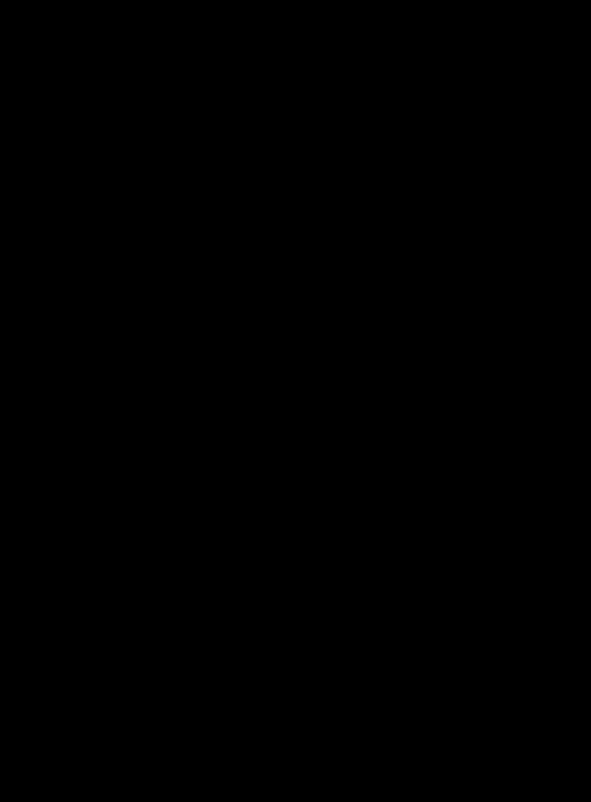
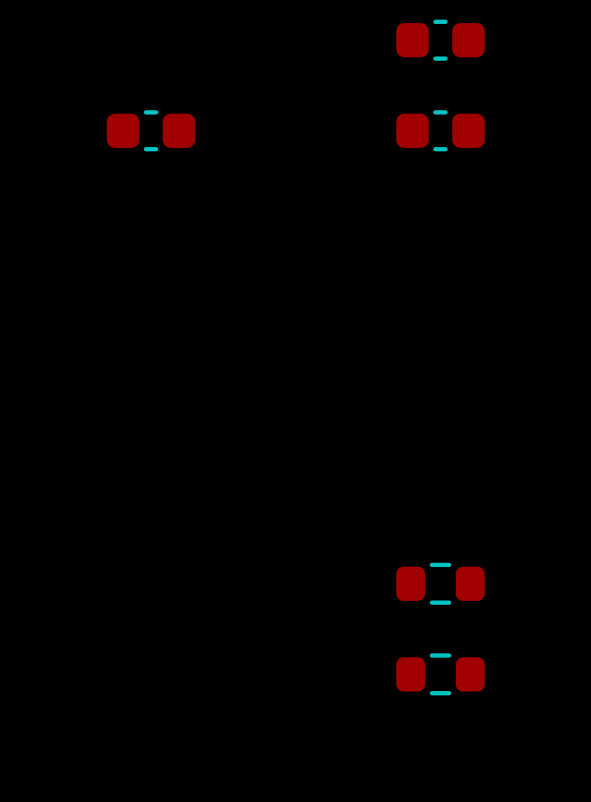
part: none -> (440, 40)
part: none -> (151, 130)
part: none -> (440, 130)
part: none -> (440, 583)
part: none -> (440, 674)

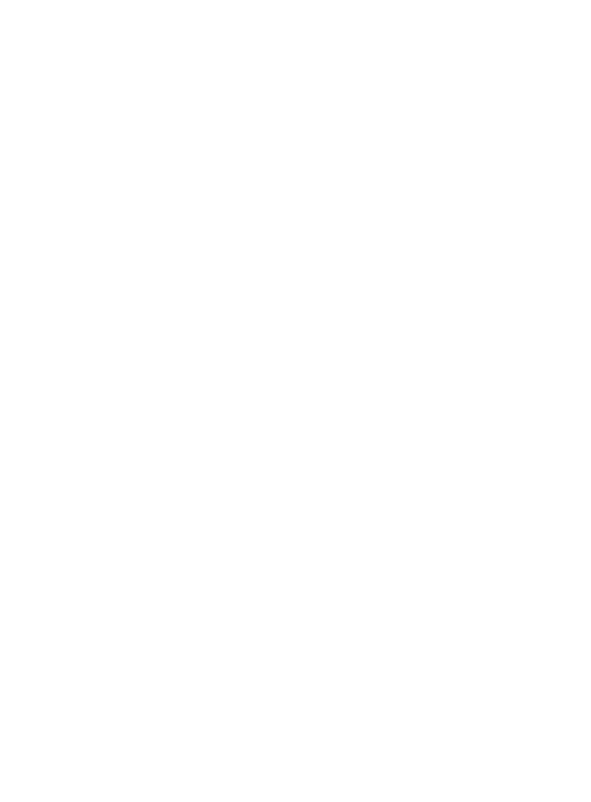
part: (440, 40) -> none
part: (151, 130) -> none
part: (440, 130) -> none
part: (440, 583) -> none
part: (440, 674) -> none

